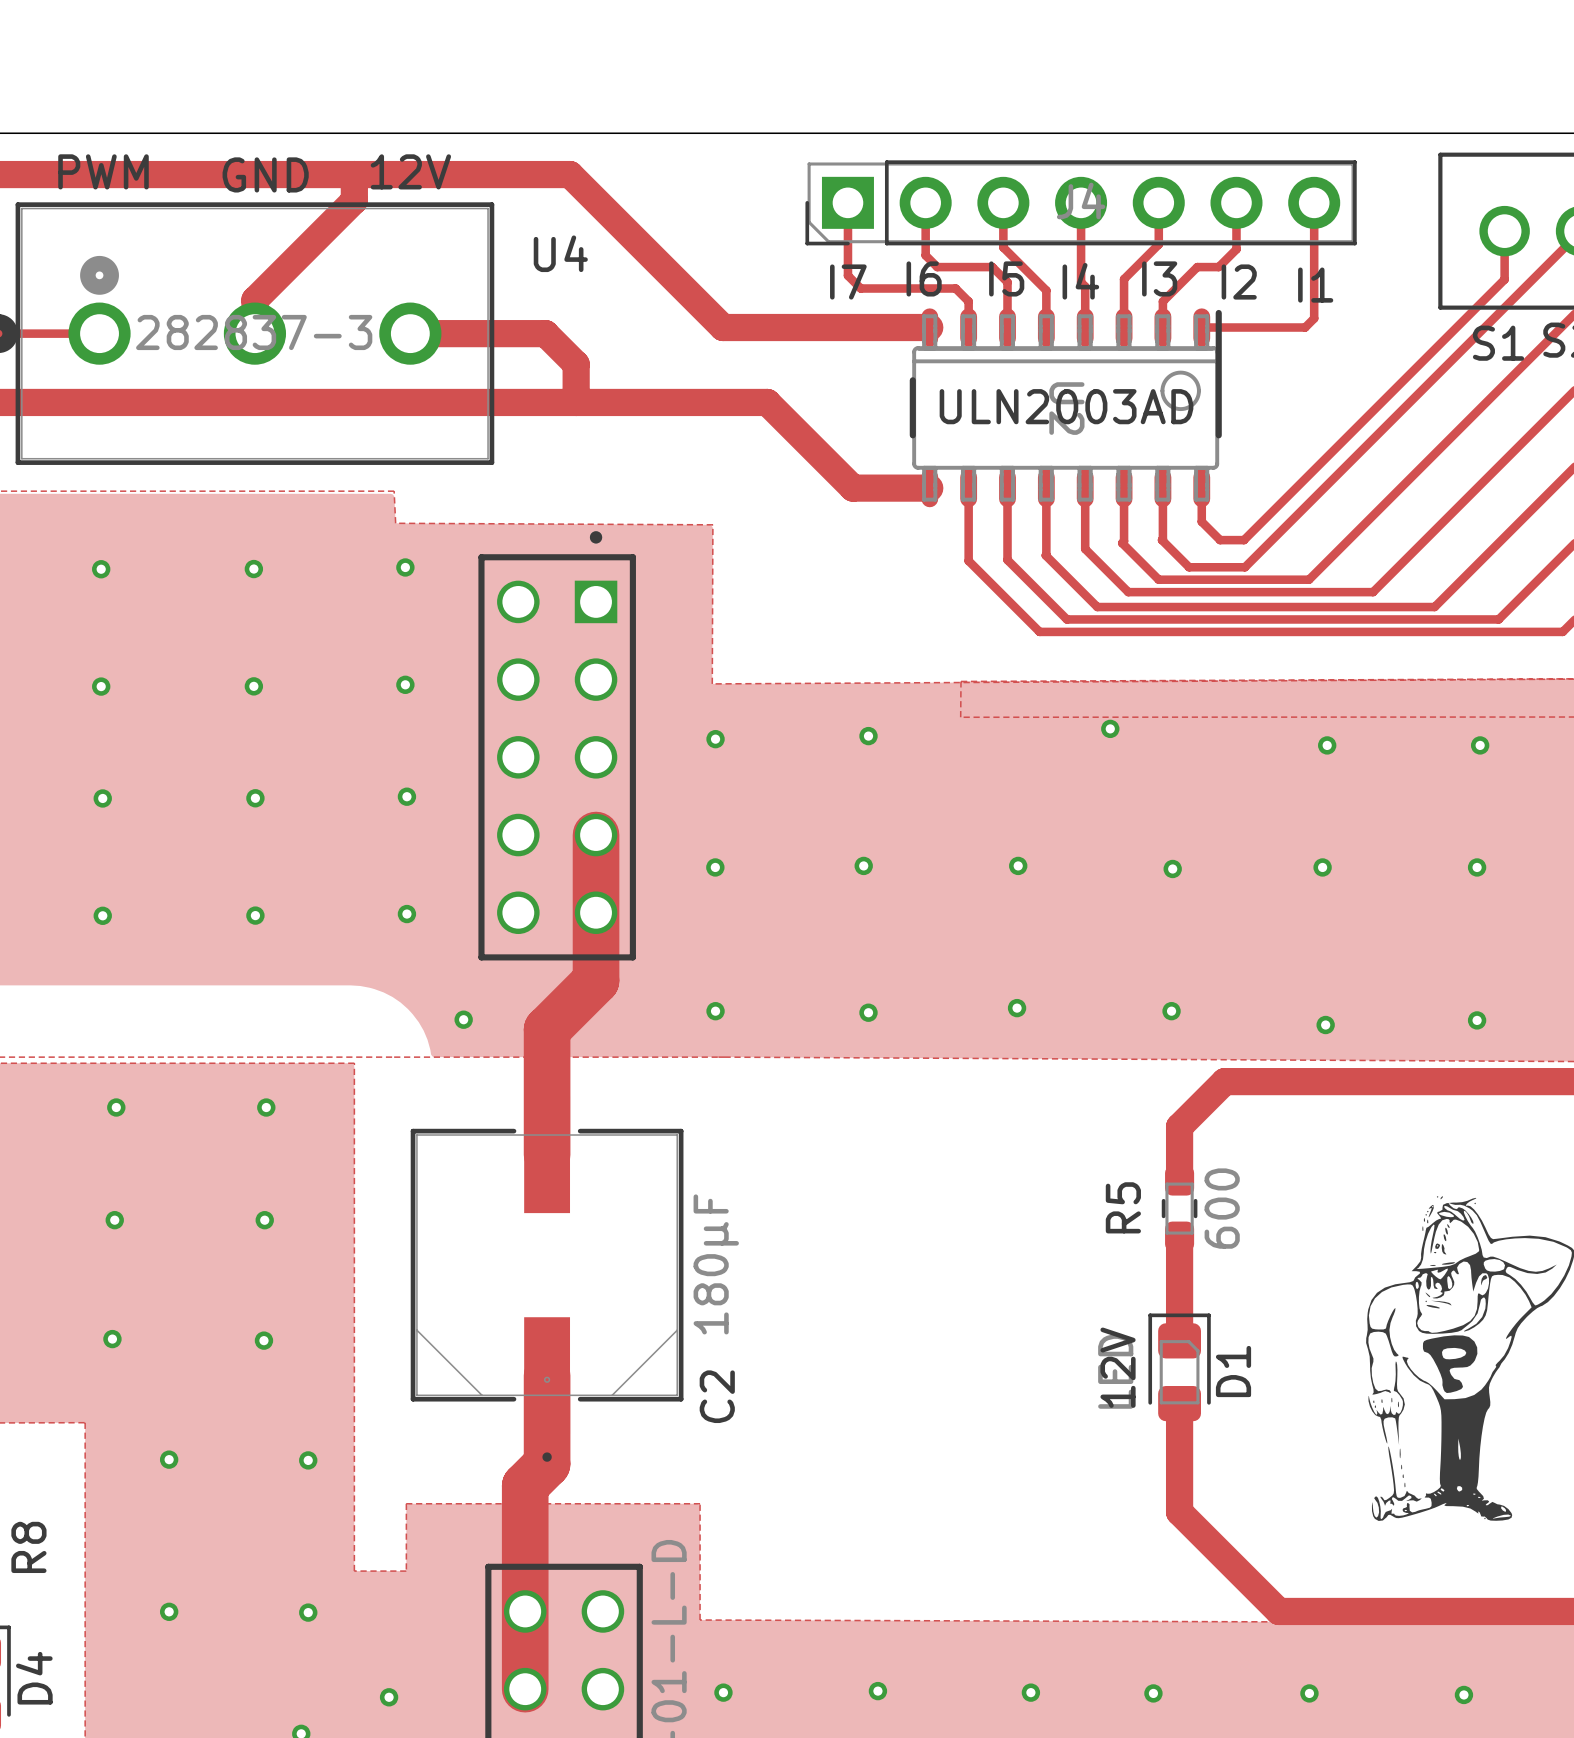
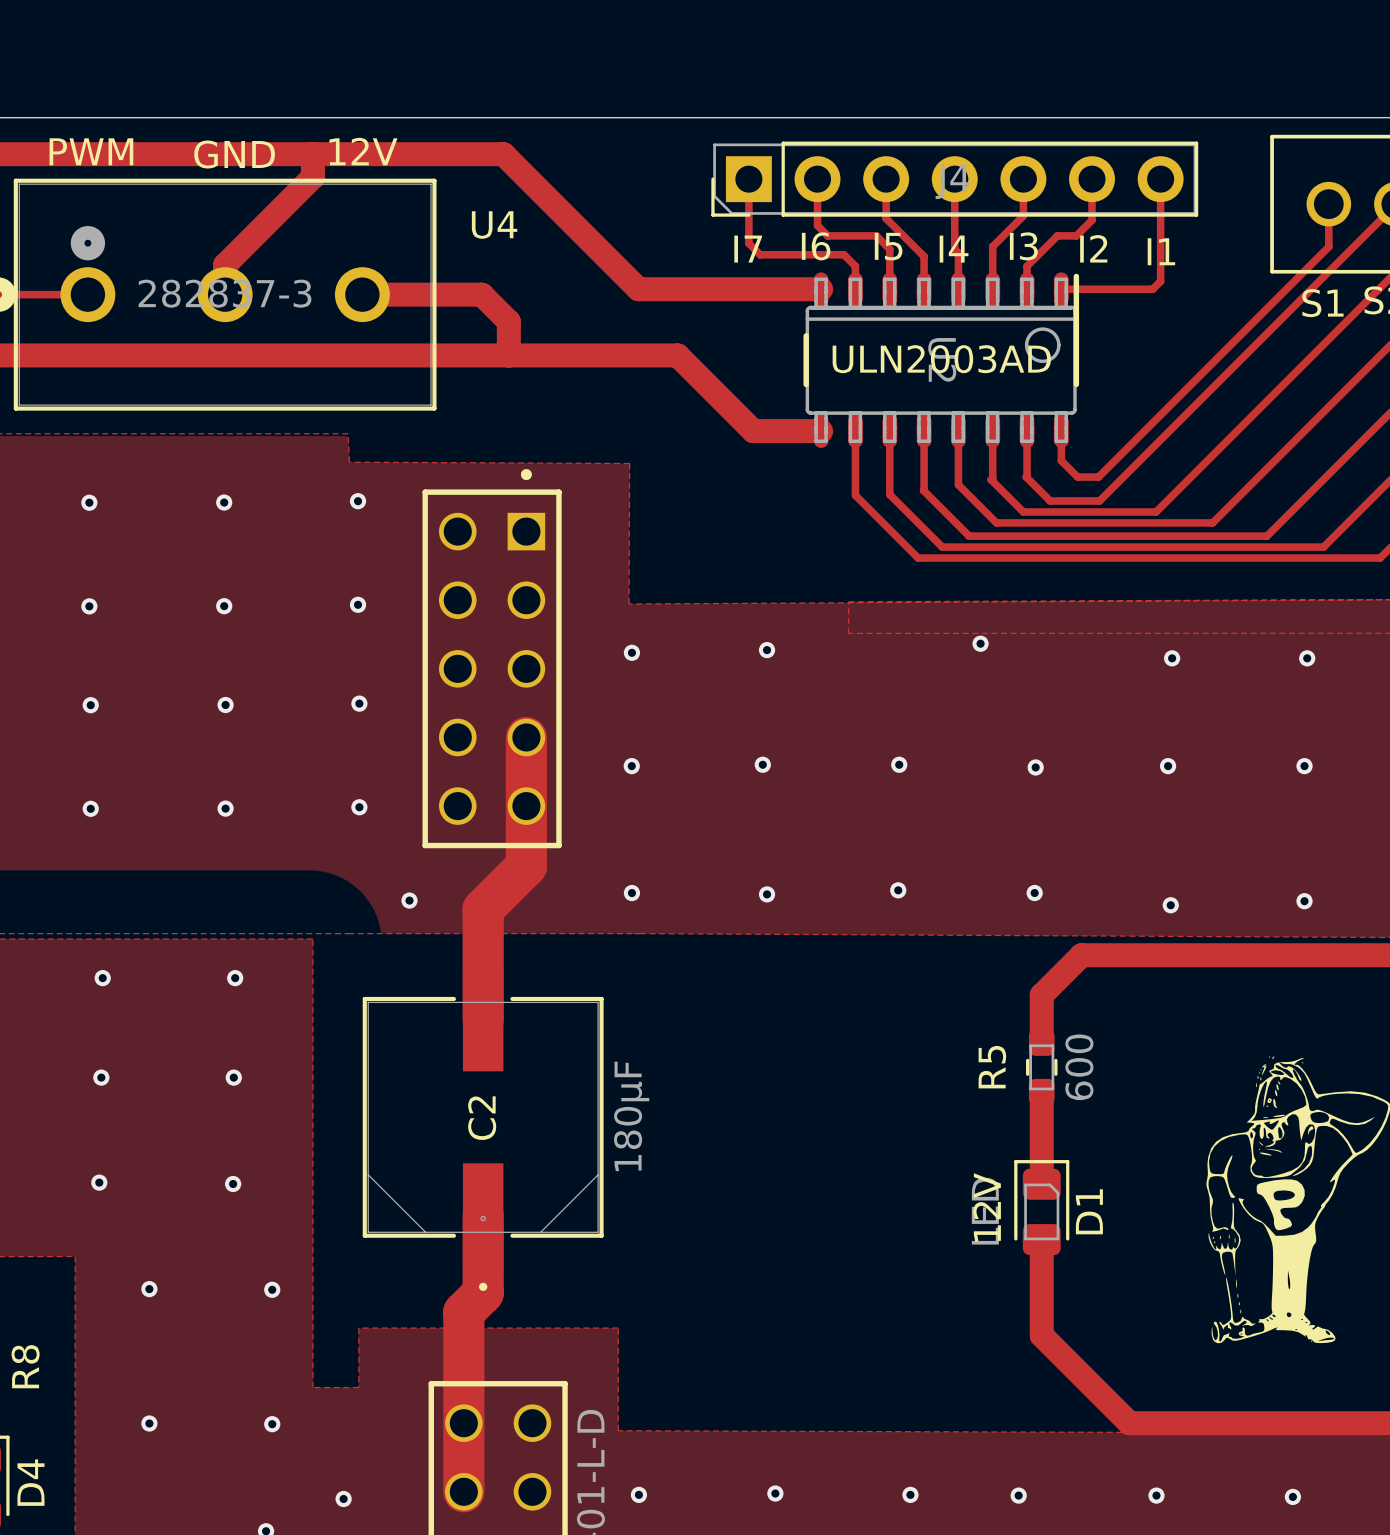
C2 name position: C2 (717, 1396) -> C2 (482, 1118)

